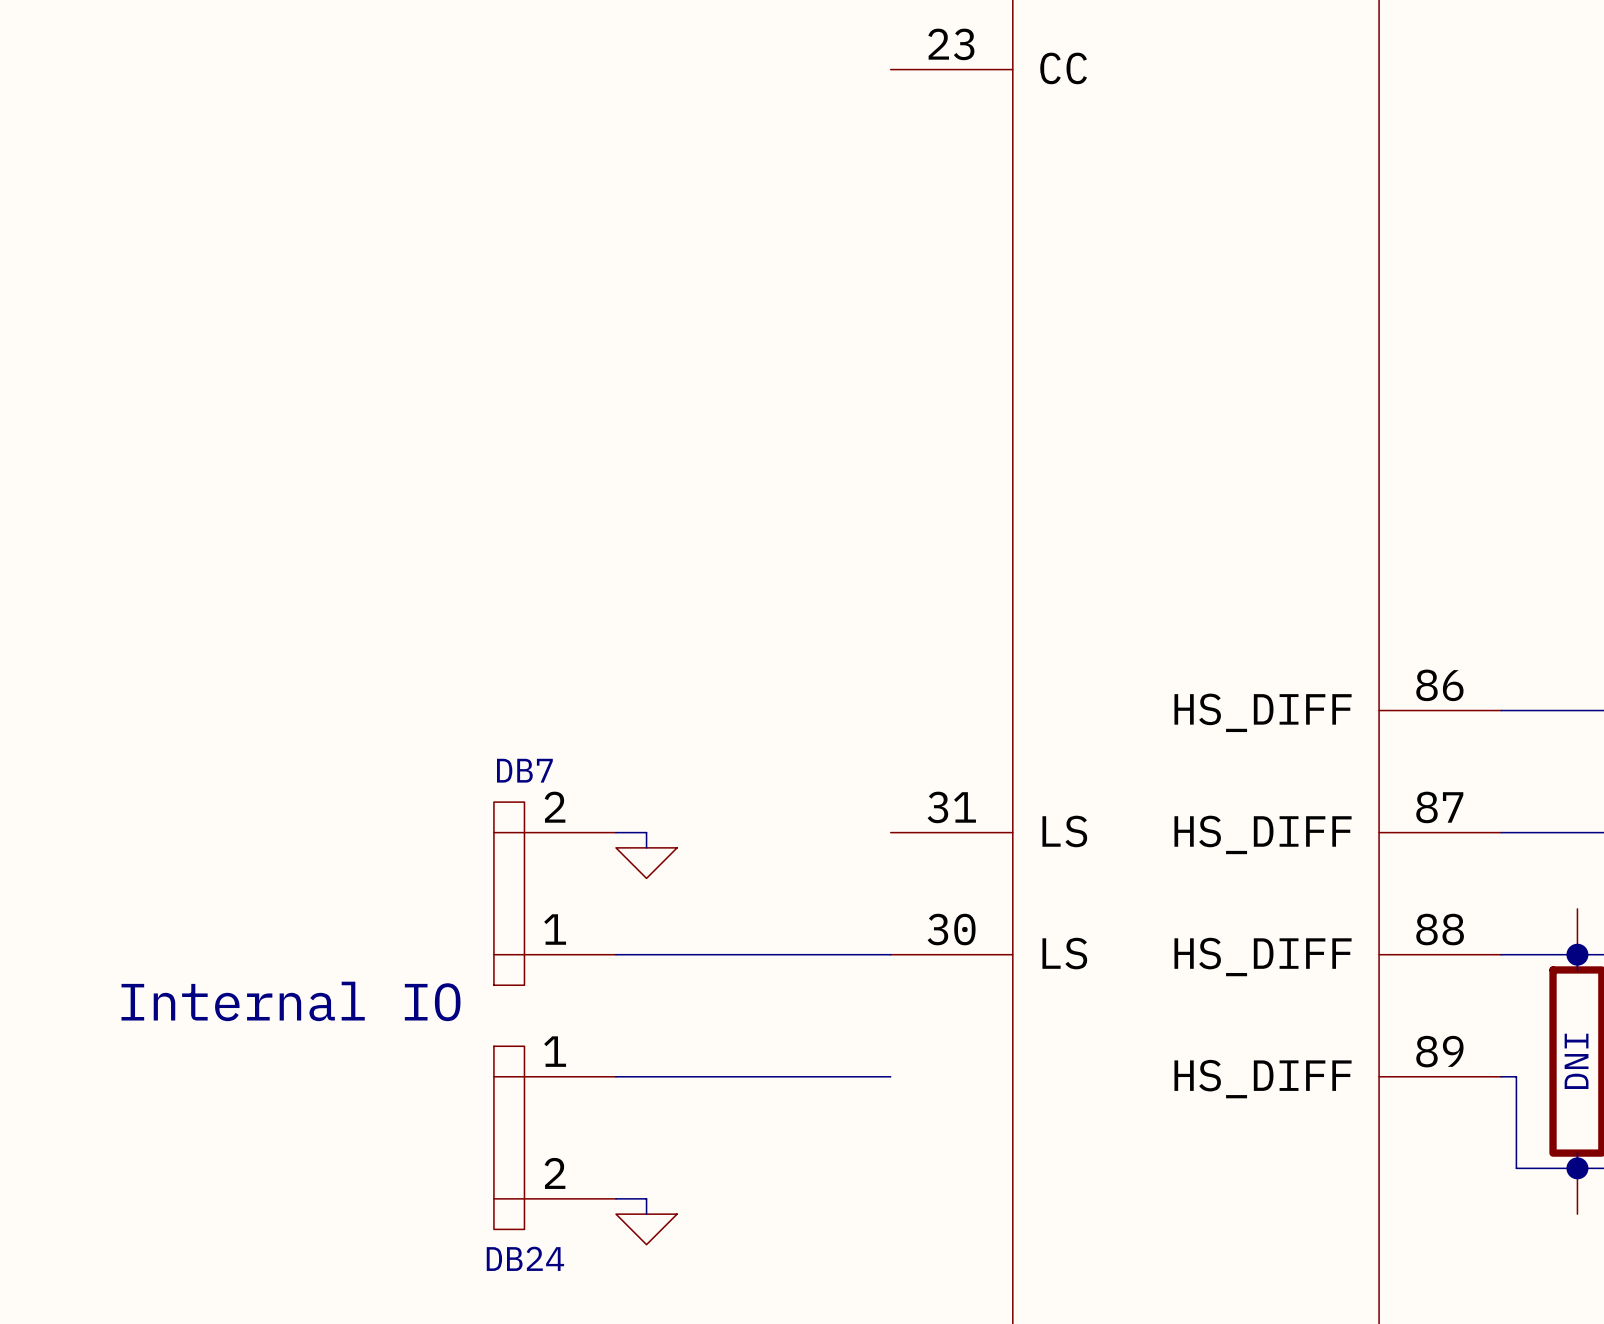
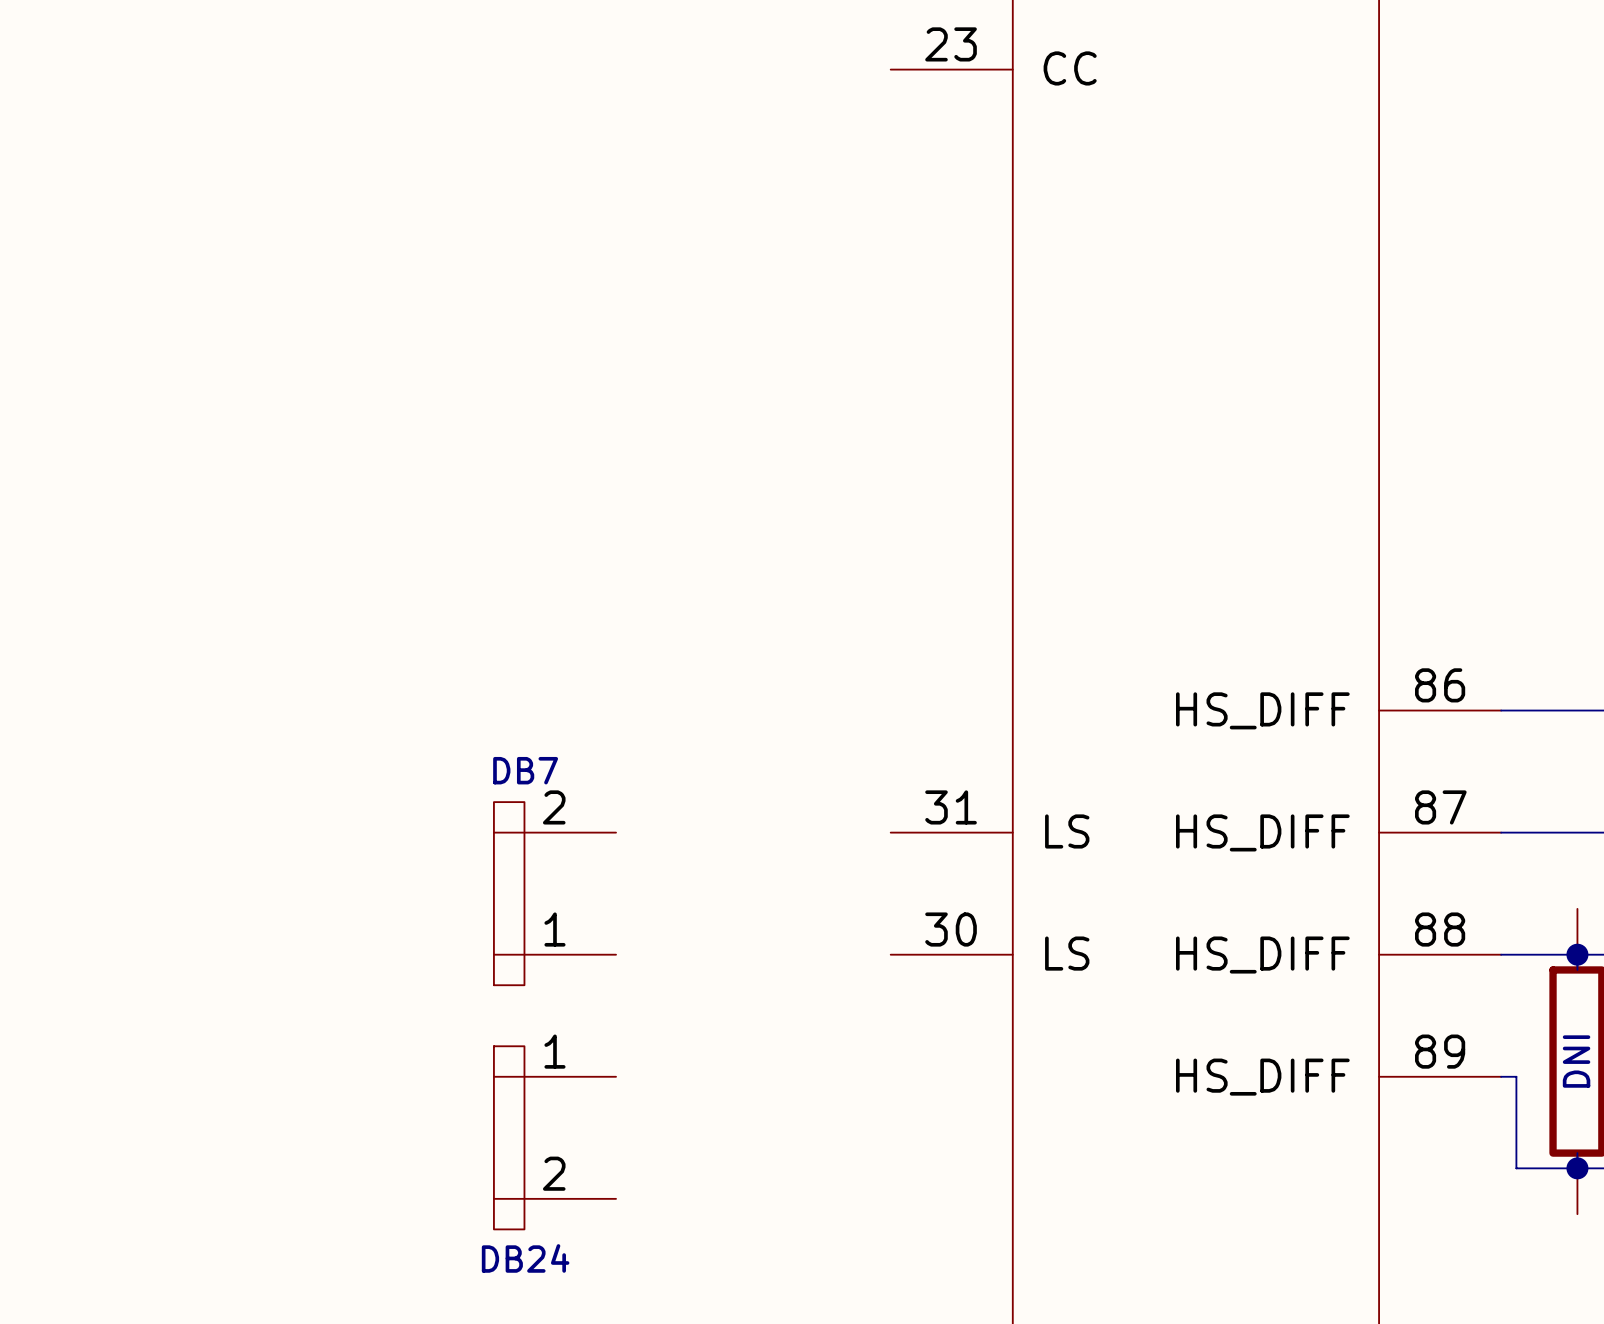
wire: (616, 832) (646, 832) (646, 847) -> none
power symbol: (646, 863) -> none
wire: (616, 954) (890, 954) -> none
text: Internal IO (290, 1001) -> none
wire: (616, 1076) (890, 1076) -> none
wire: (616, 1198) (646, 1198) (646, 1214) -> none
power symbol: (646, 1229) -> none

